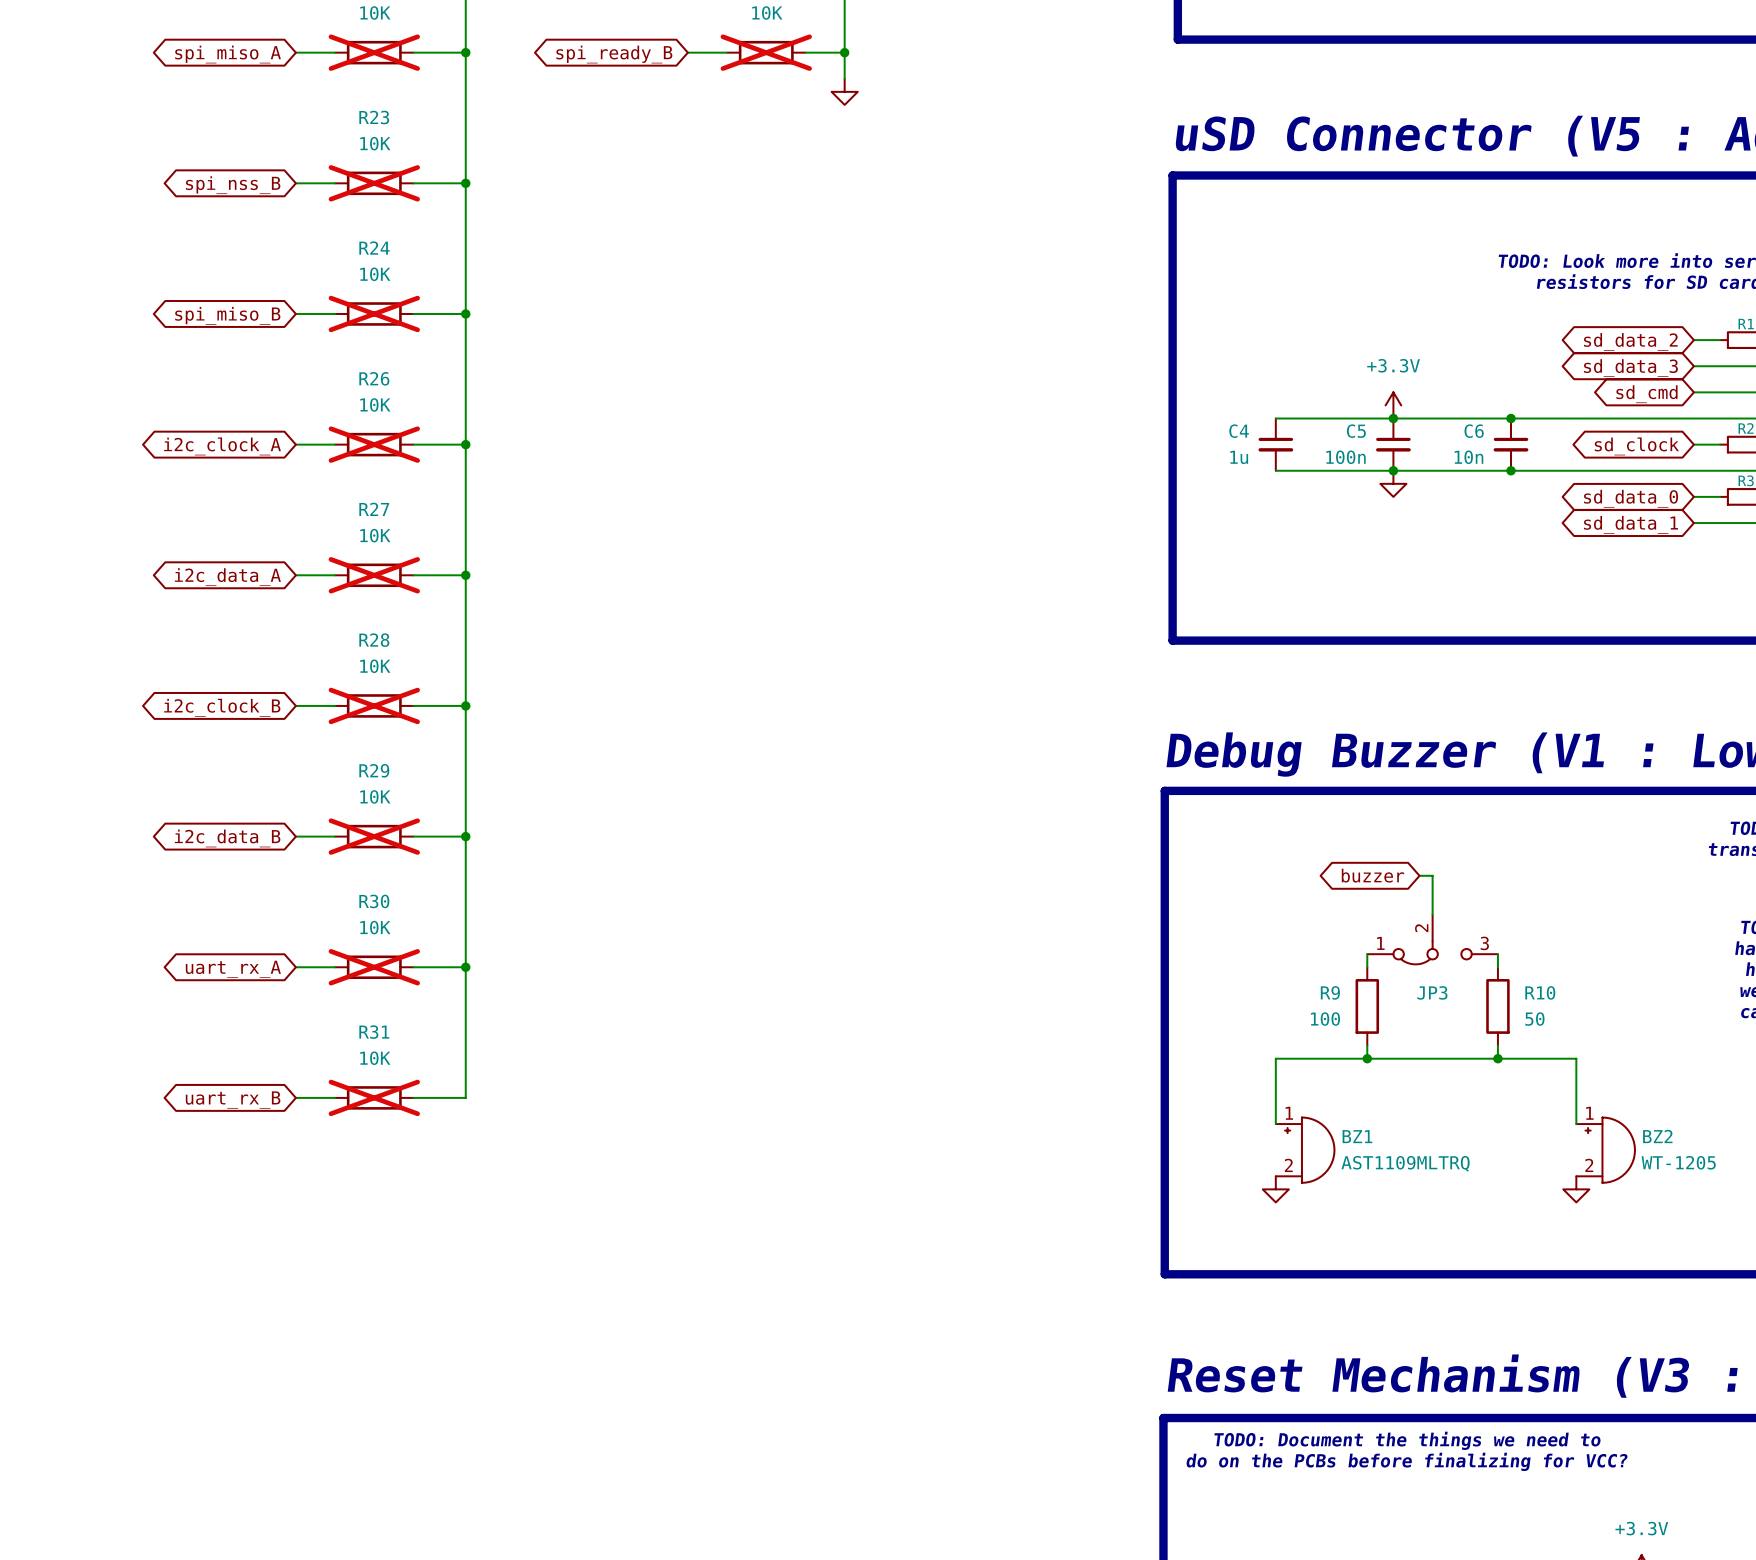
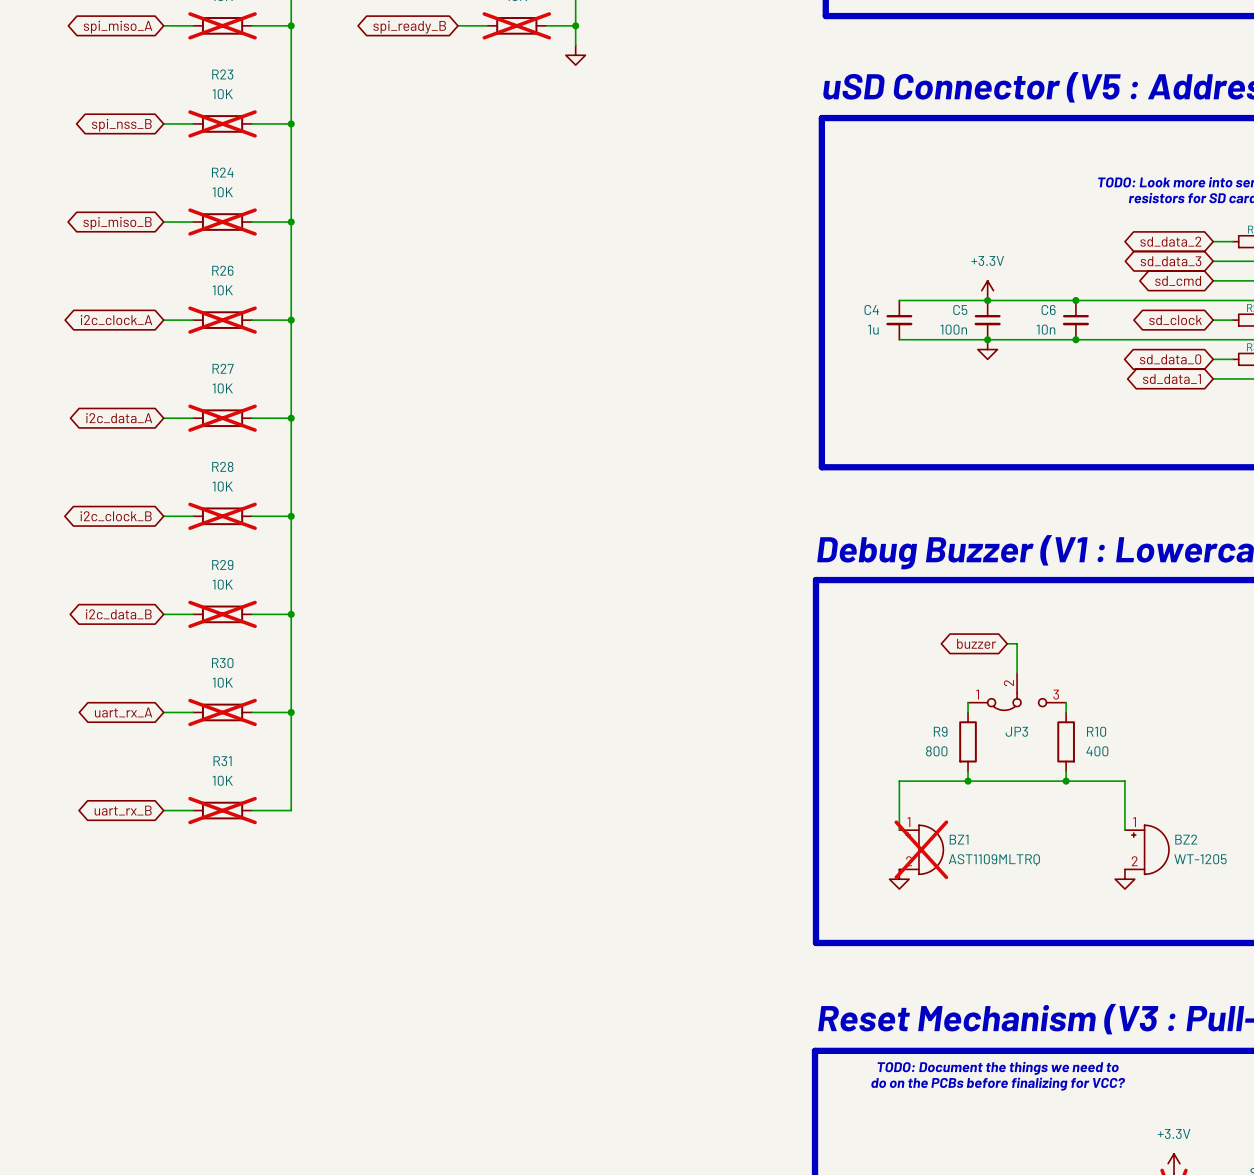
R9 value: 100 (1325, 1019) -> 800 (936, 751)
R10 value: 50 (1534, 1019) -> 400 (1097, 751)
BZ1 do-not-place cross: none -> (921, 849)

